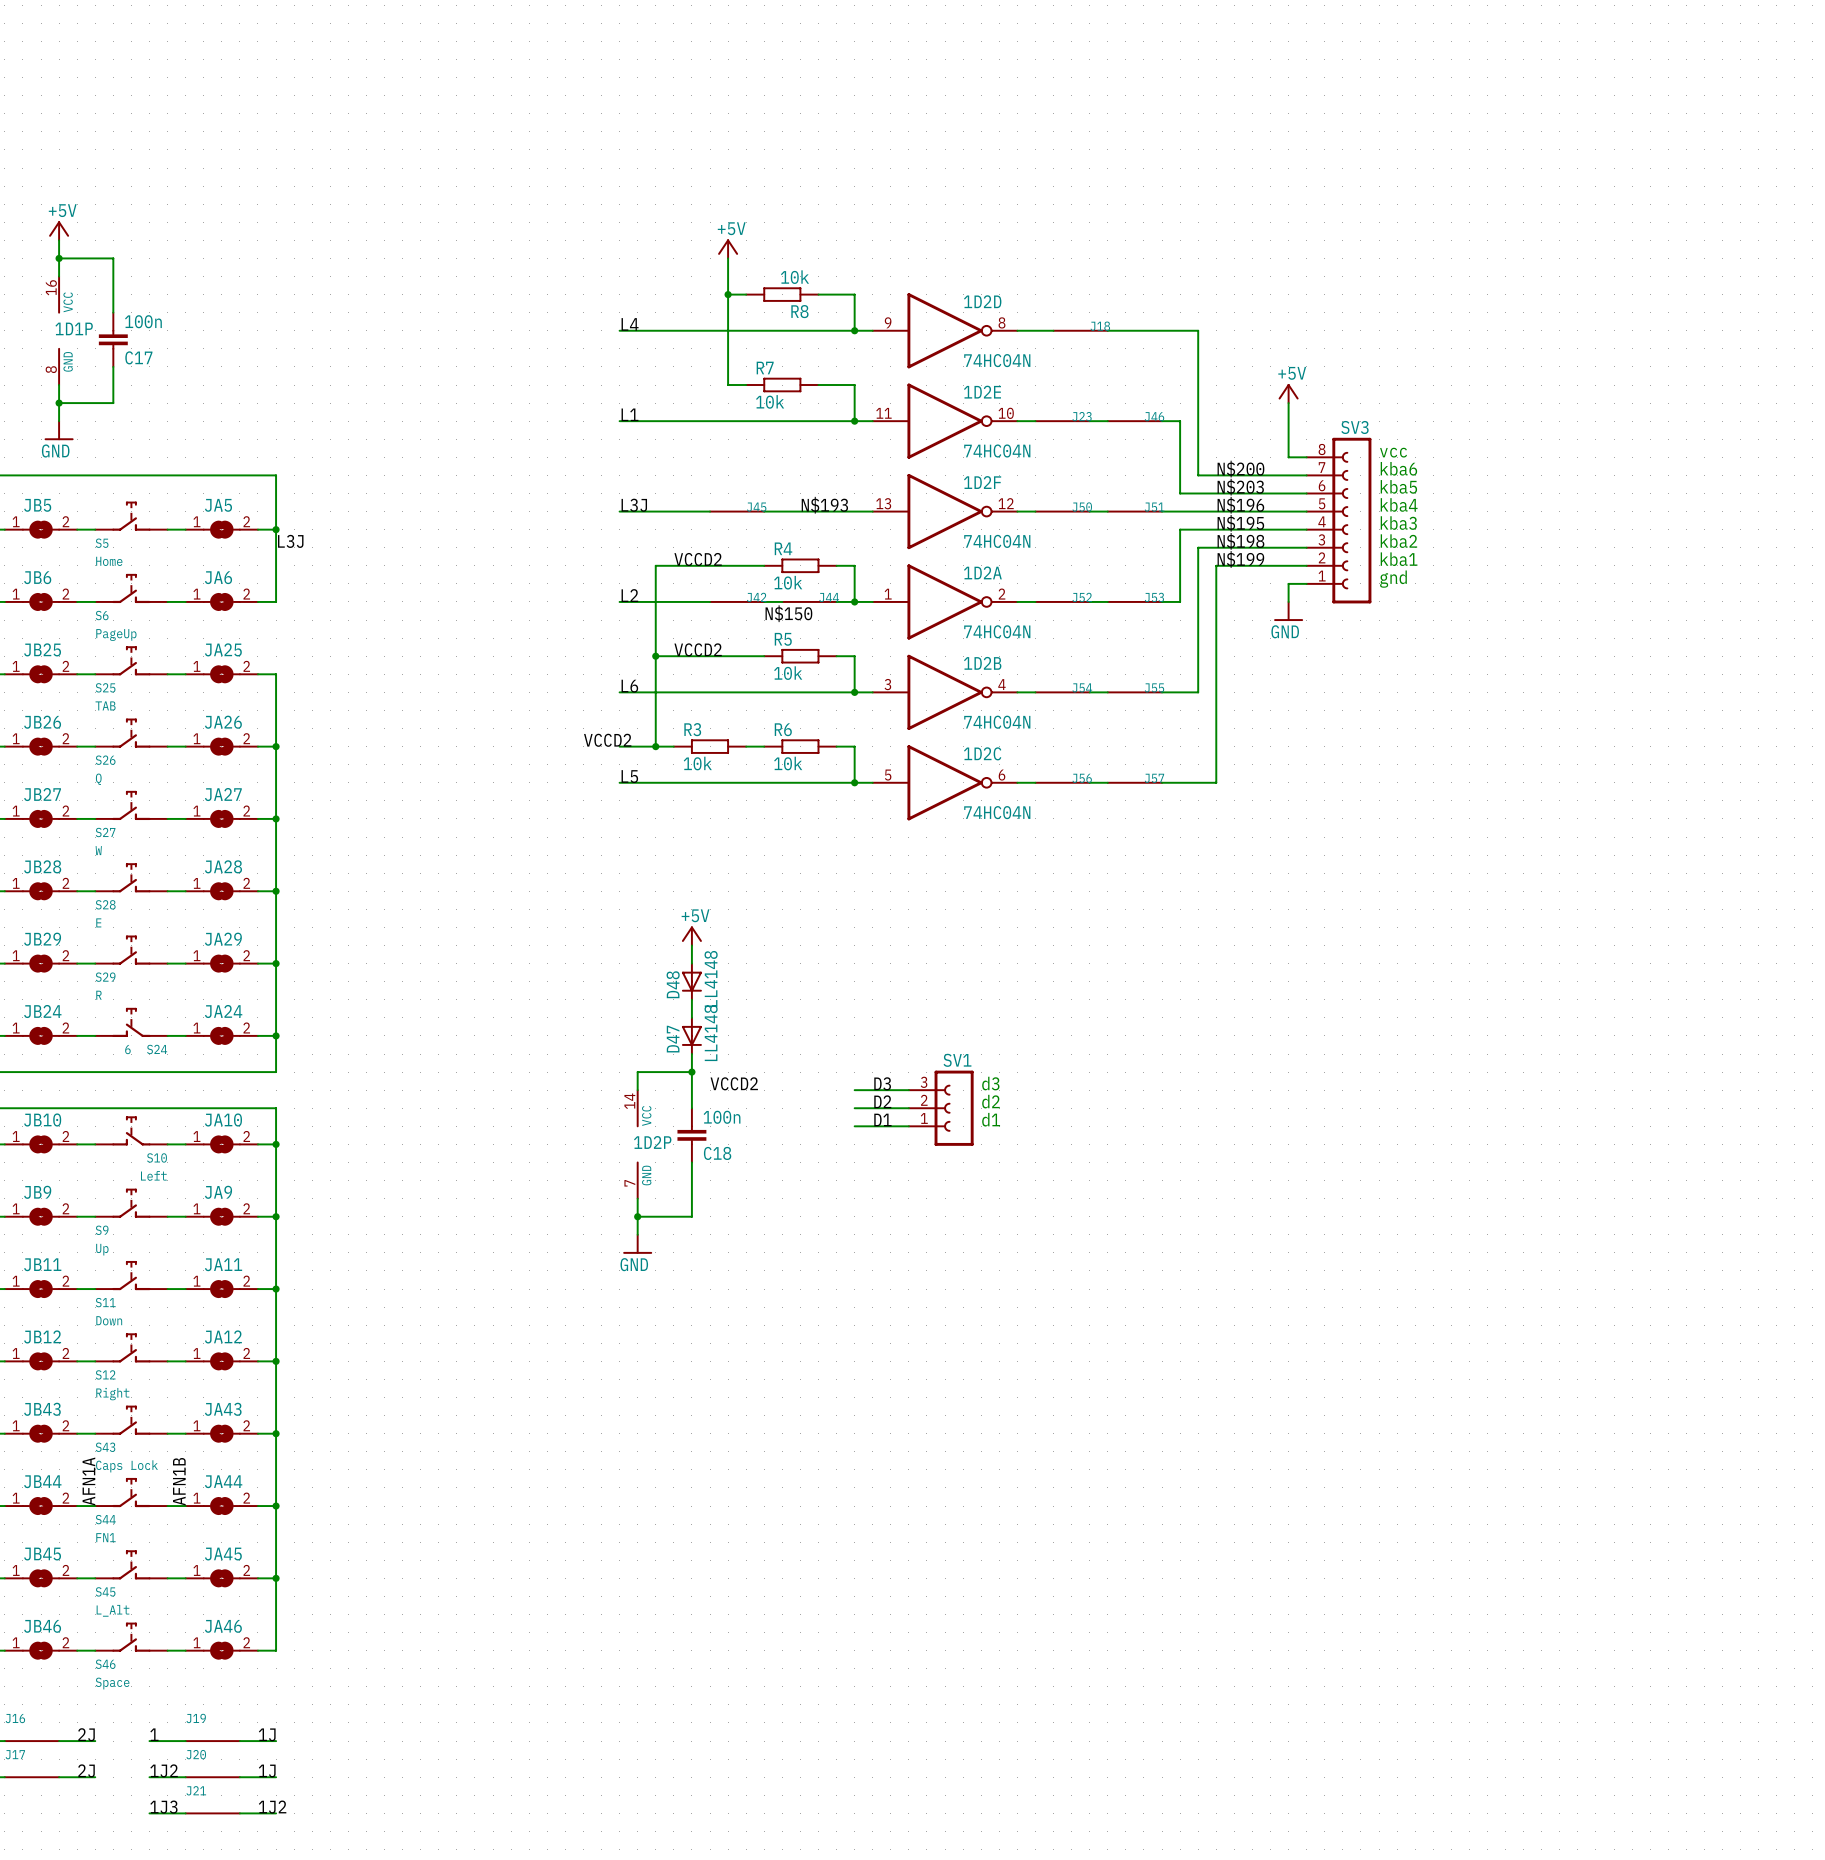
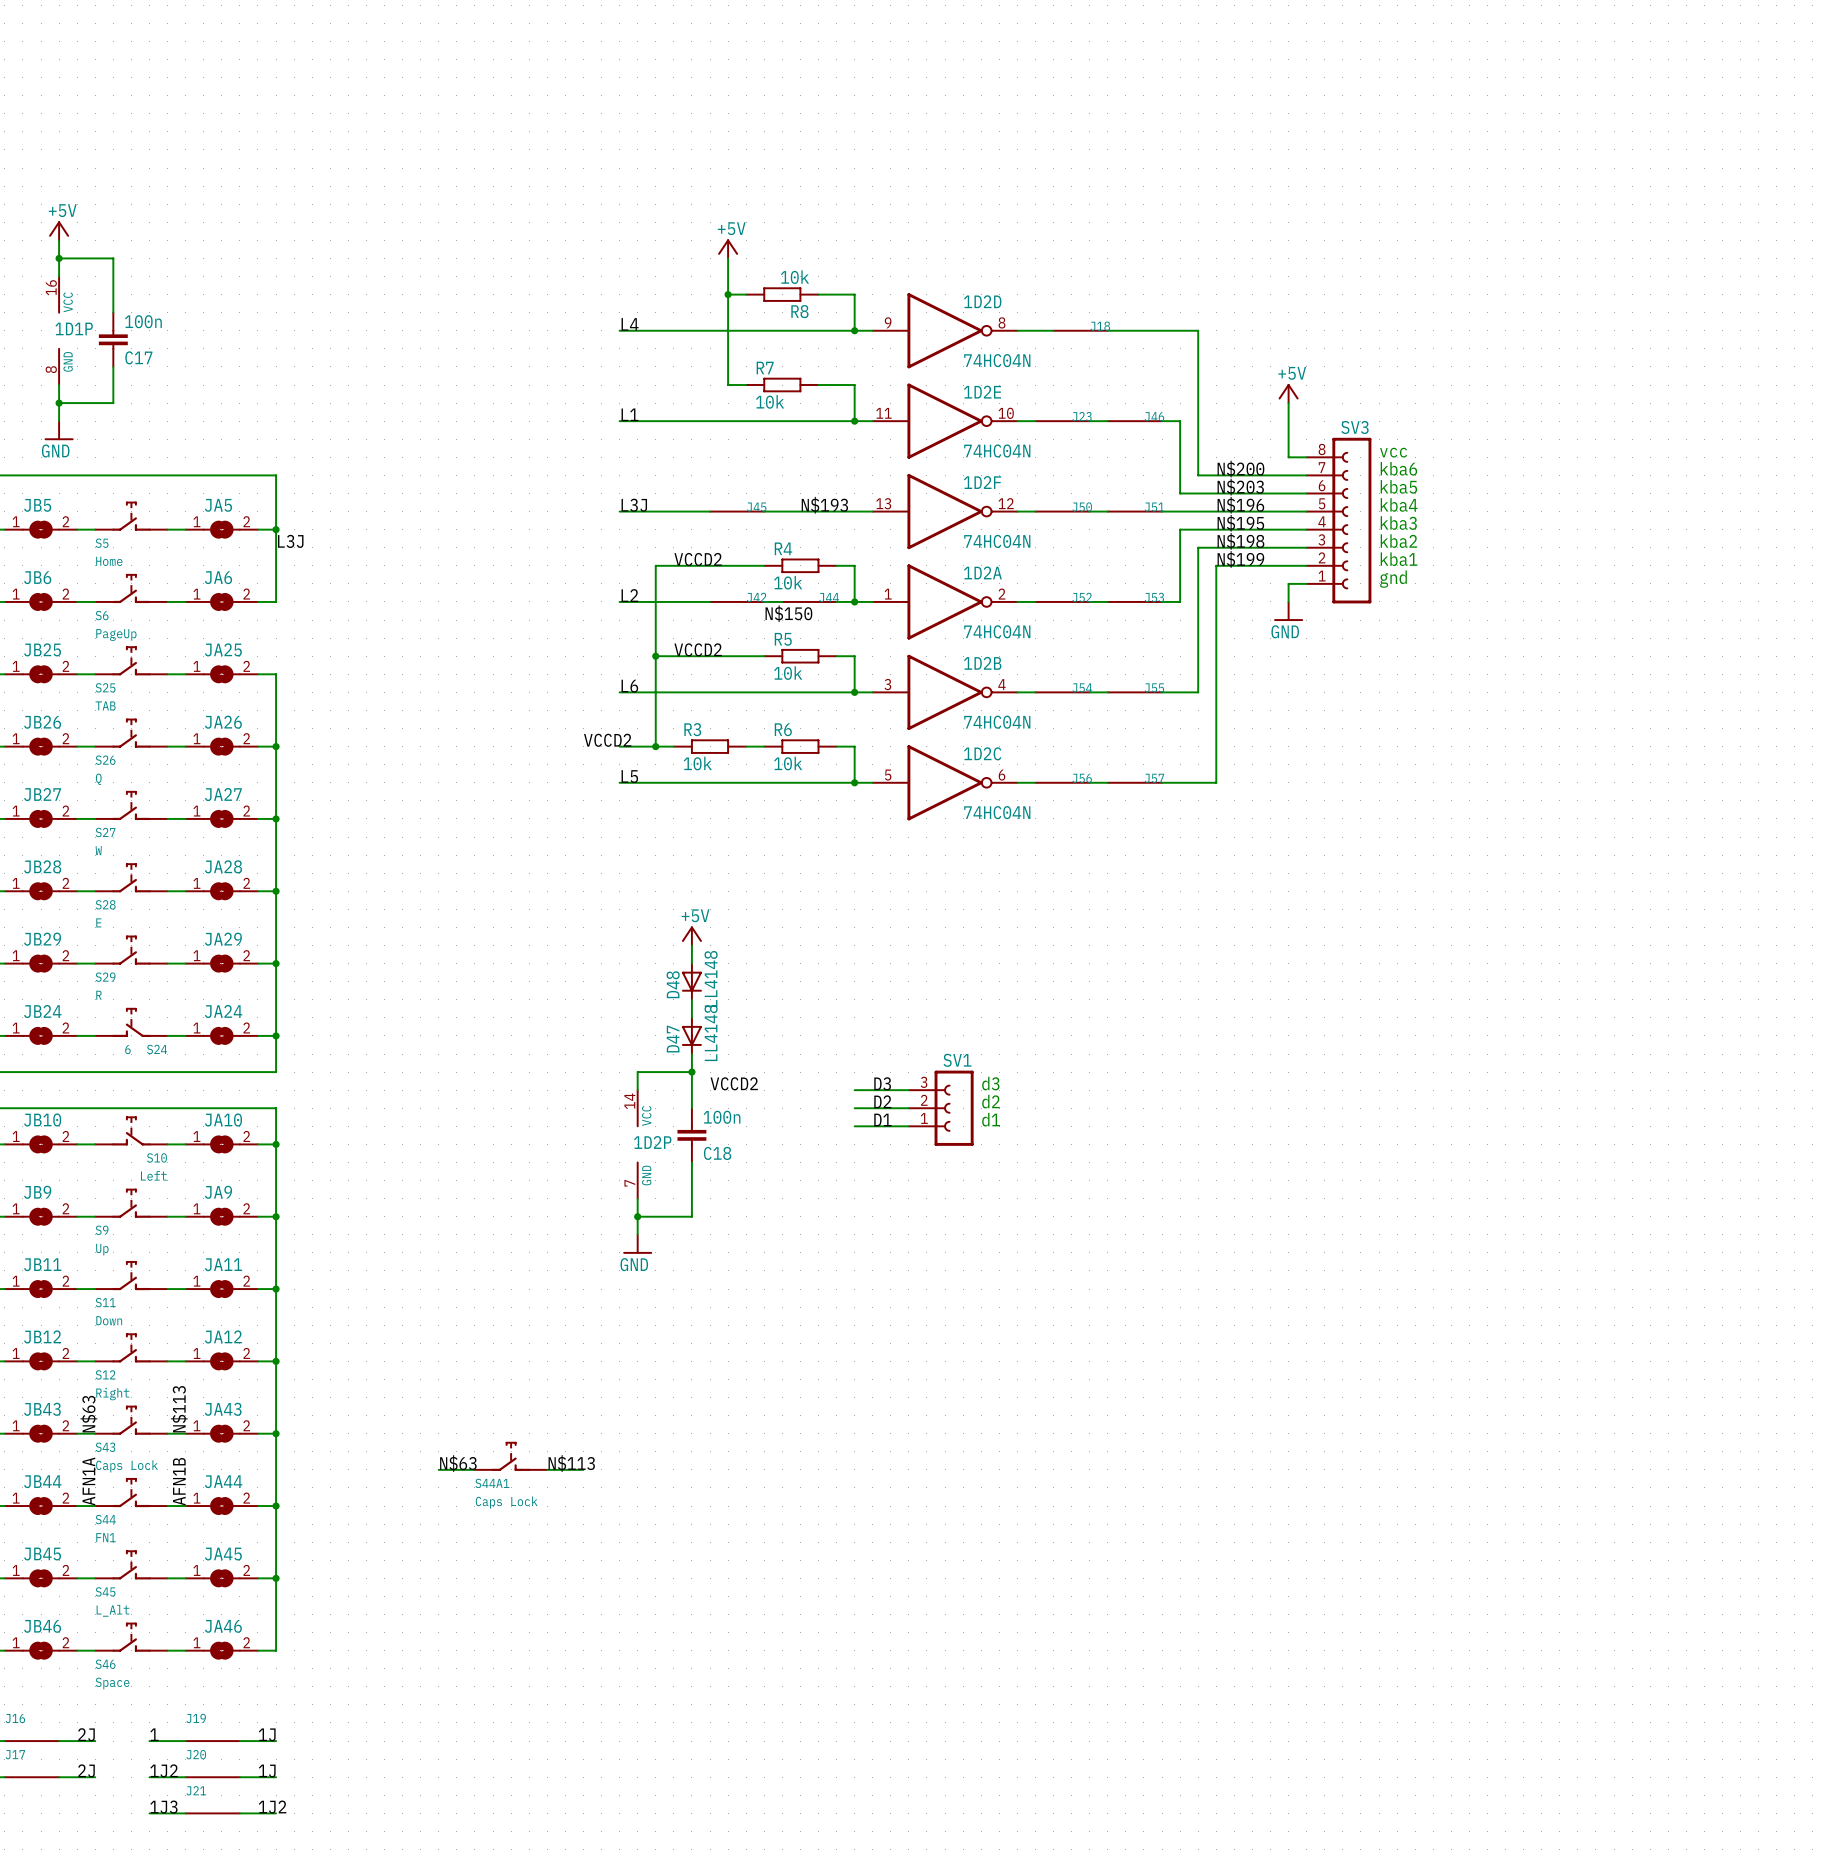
label: none -> N$113 (179, 1409)
label: none -> N$63 (88, 1414)
S44A1: none -> Caps Lock (511, 1456)
label: none -> N$63 (458, 1463)
label: none -> N$113 (571, 1463)
wire: none -> (438, 1469) (474, 1469)
wire: none -> (547, 1469) (583, 1469)

